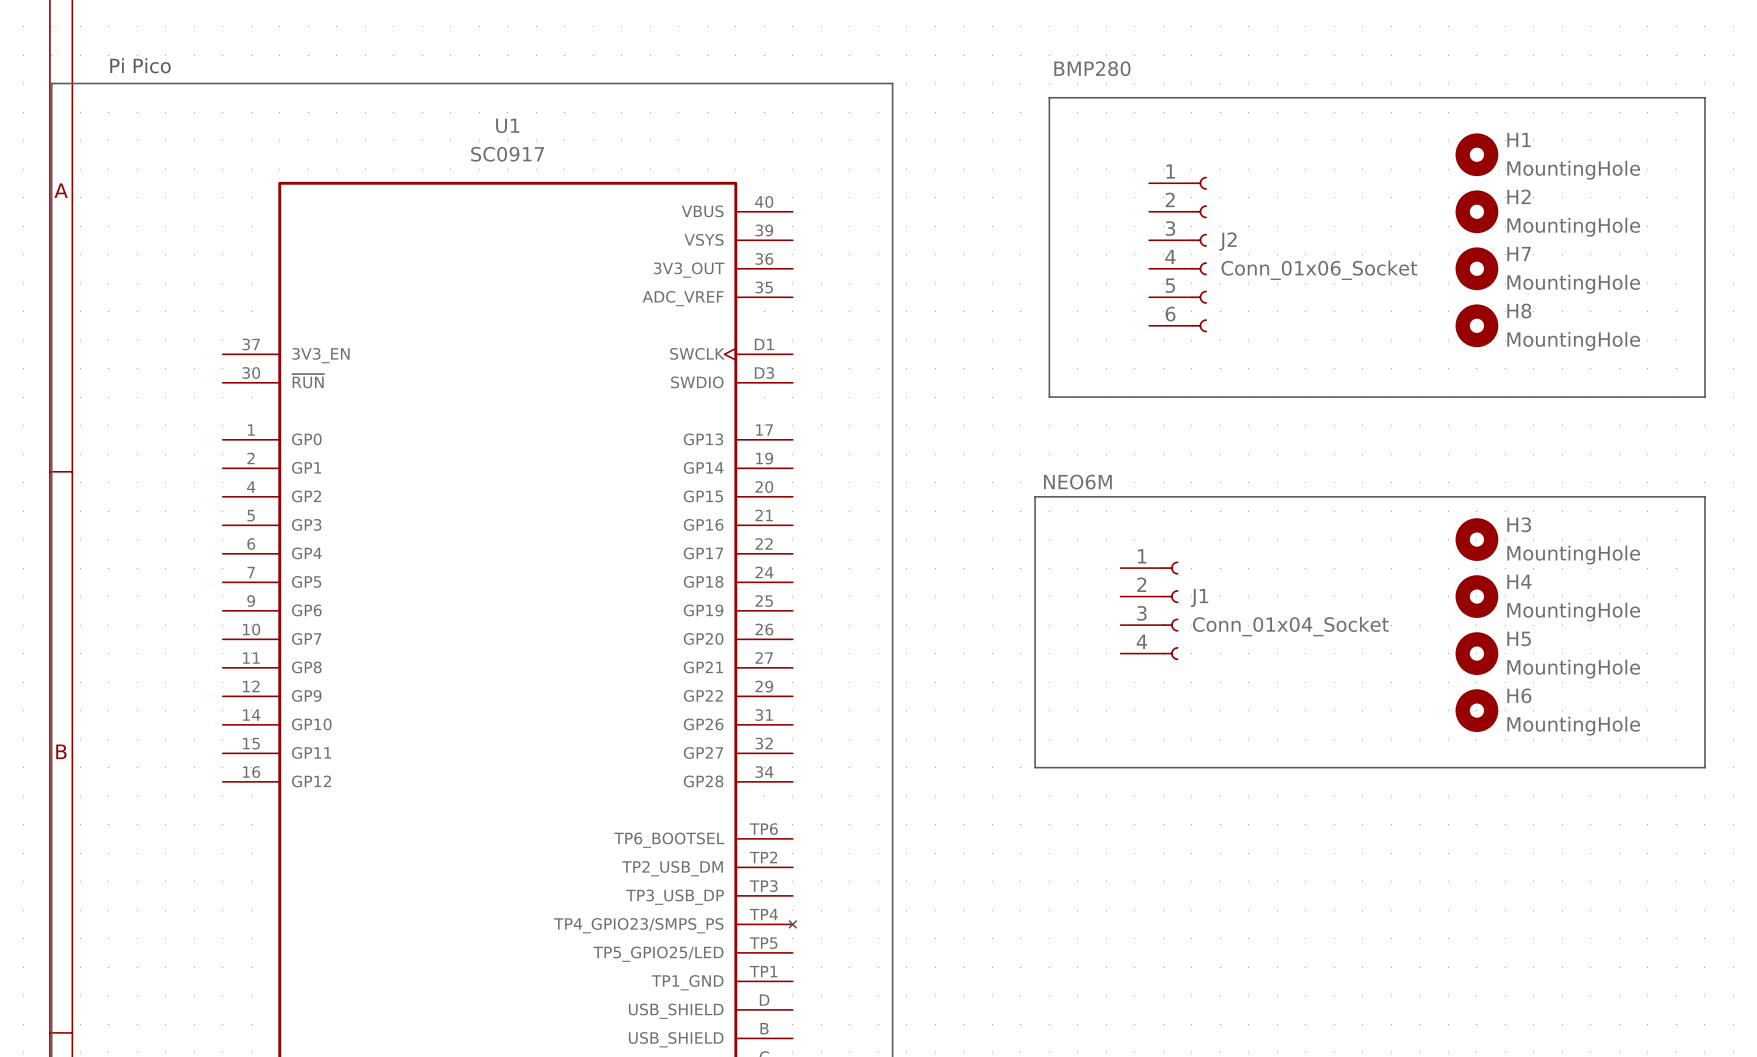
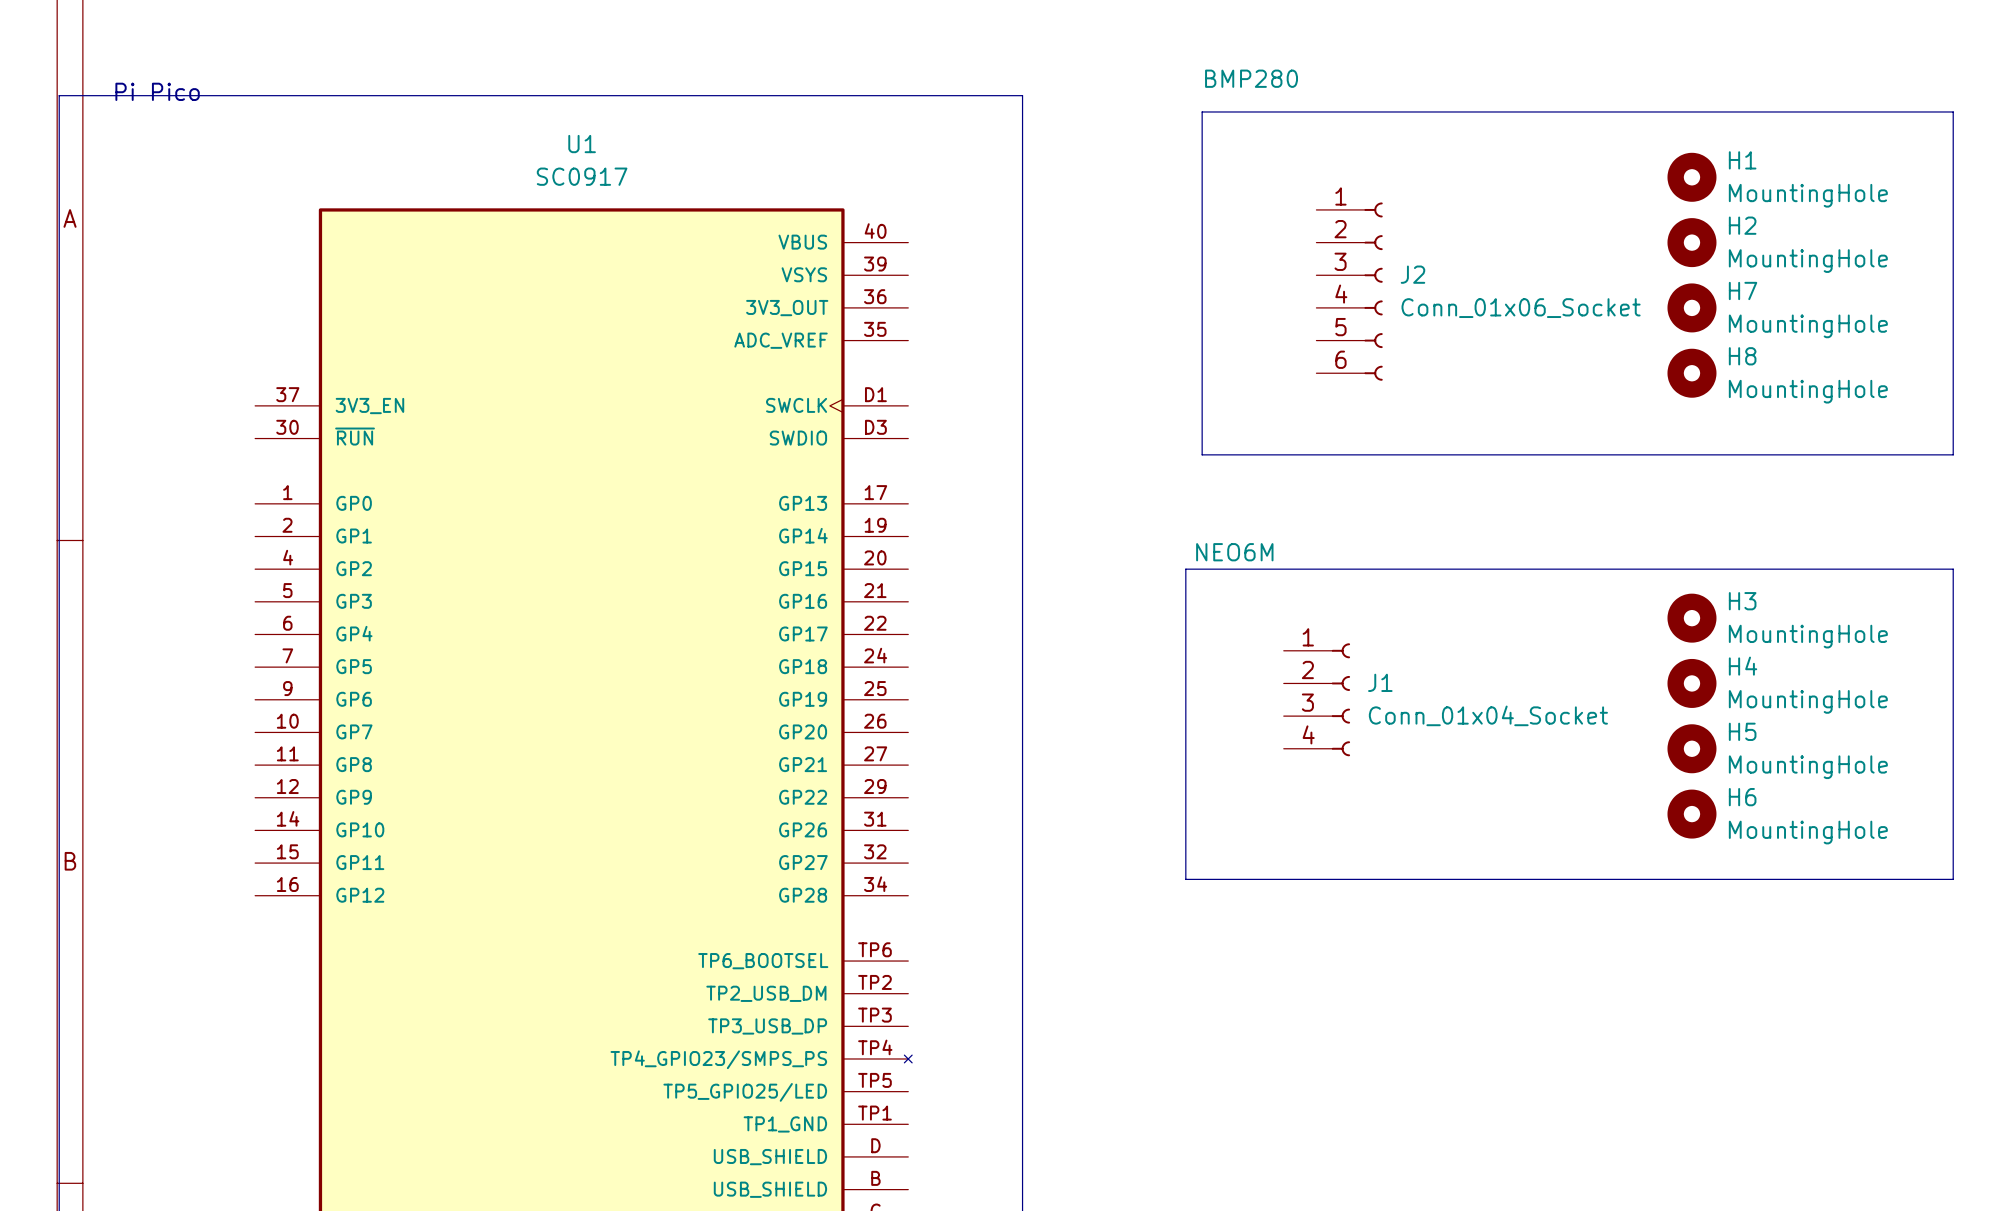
text position: Pi Pico (140, 65) -> Pi Pico (157, 91)

